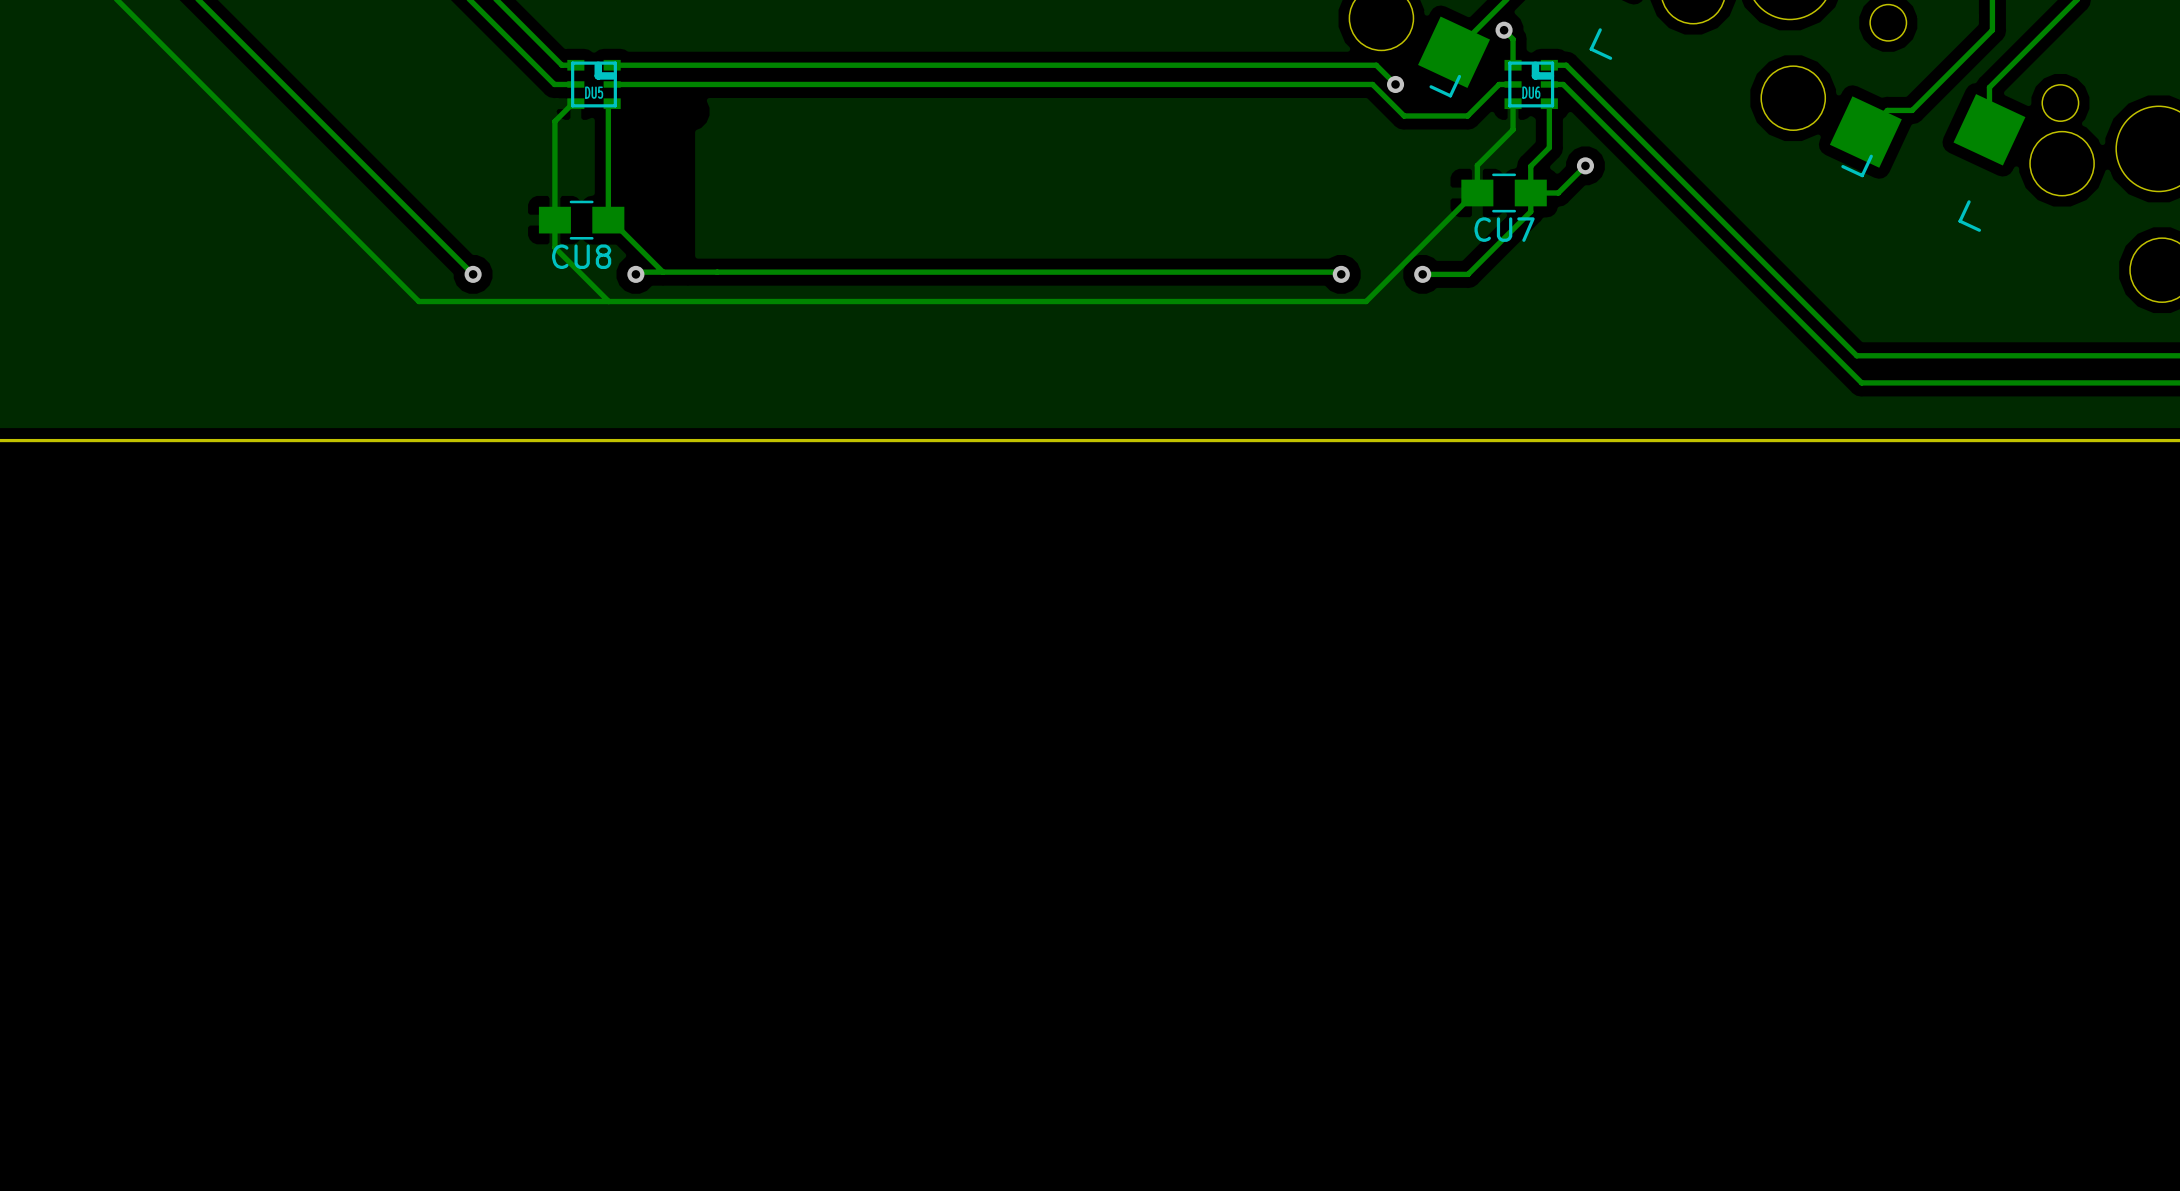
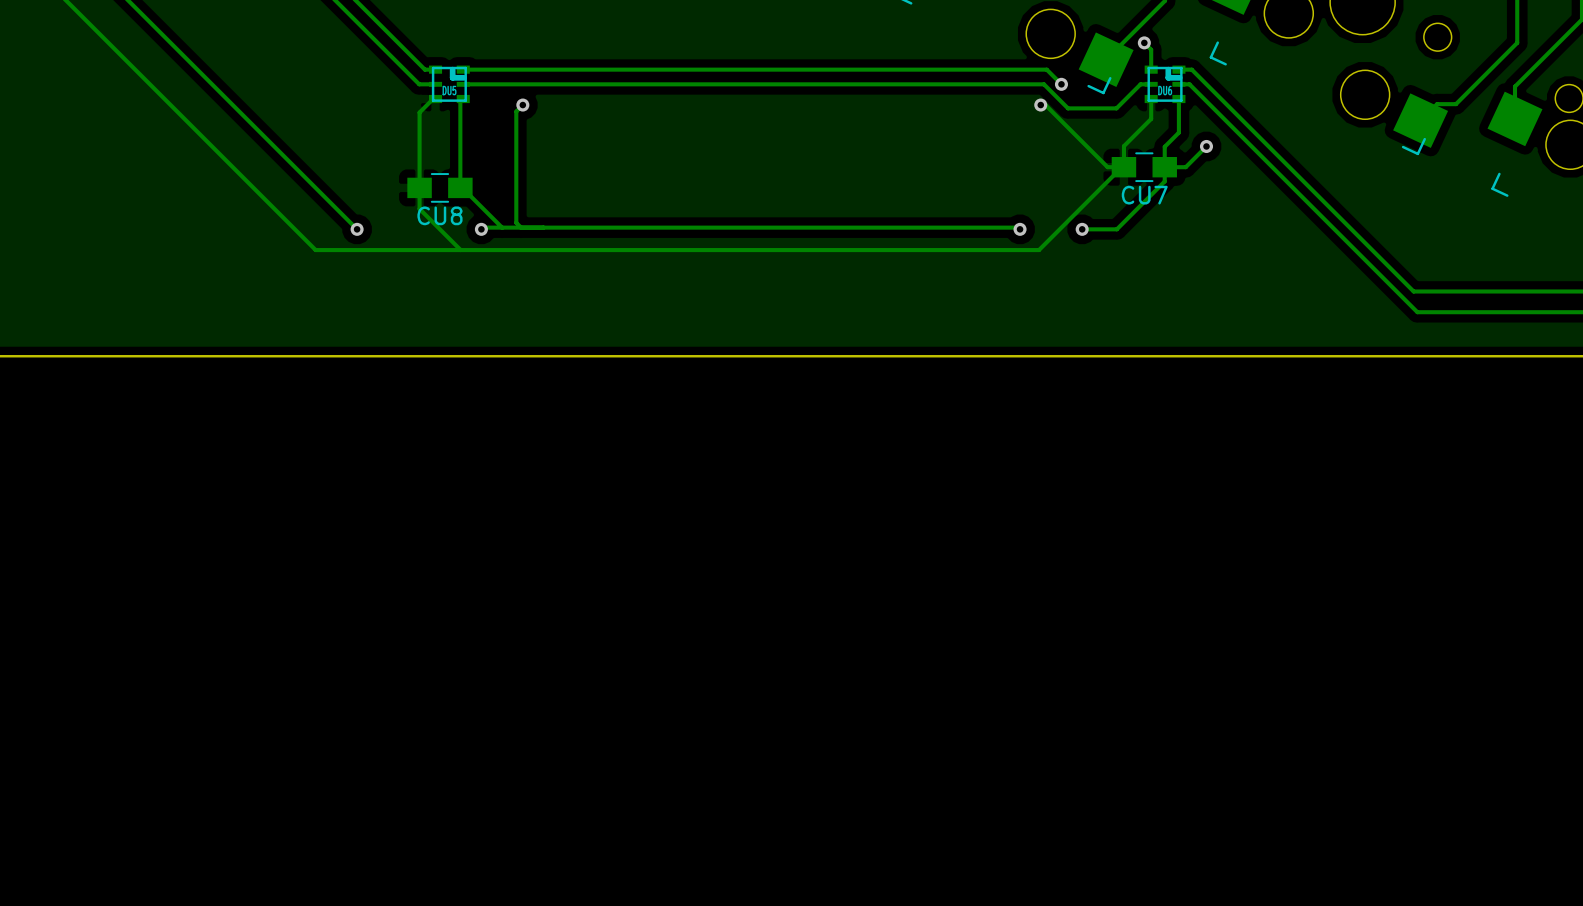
track: none -> (522, 105) (516, 111) (516, 222) (521, 227)
via: none -> (522, 105)
track: none -> (1040, 105) (1045, 105) (1107, 167) (1121, 167)
via: none -> (1040, 105)

